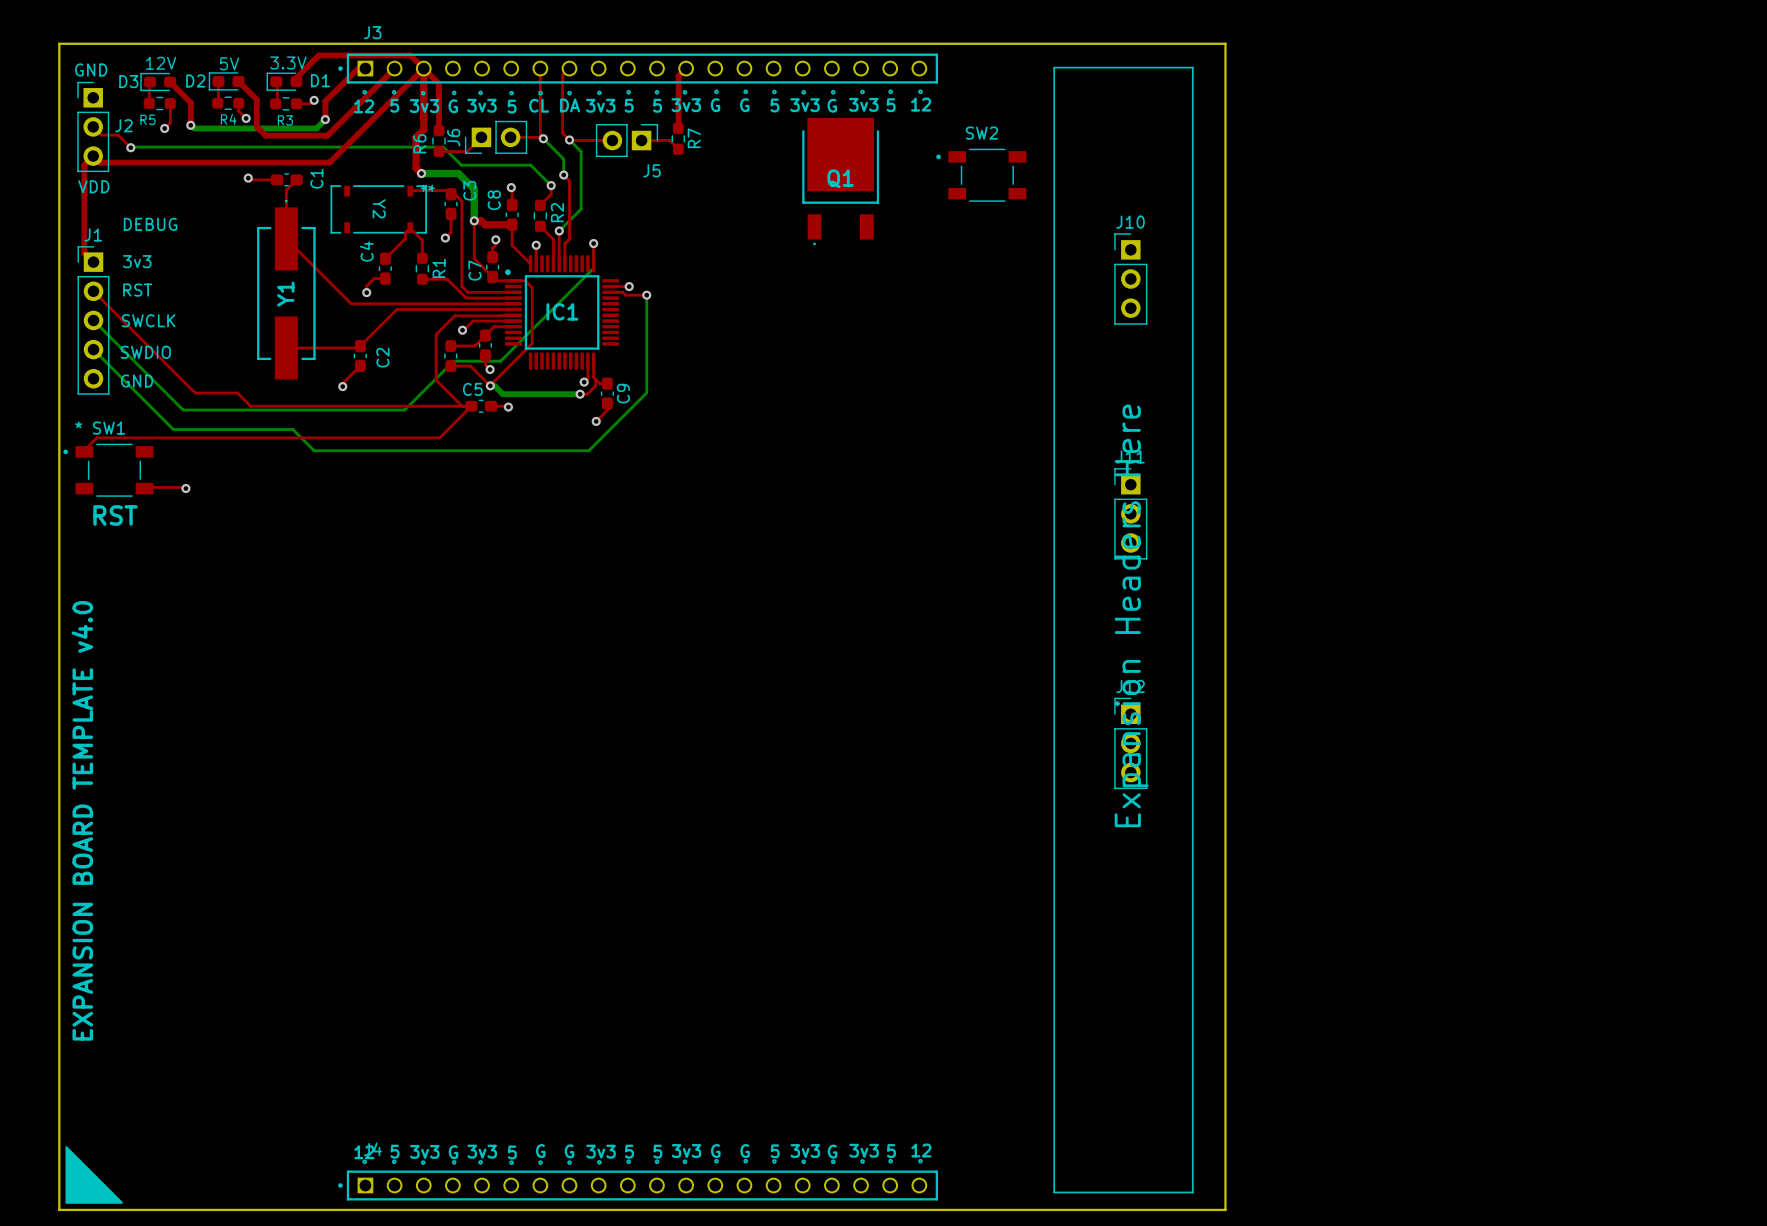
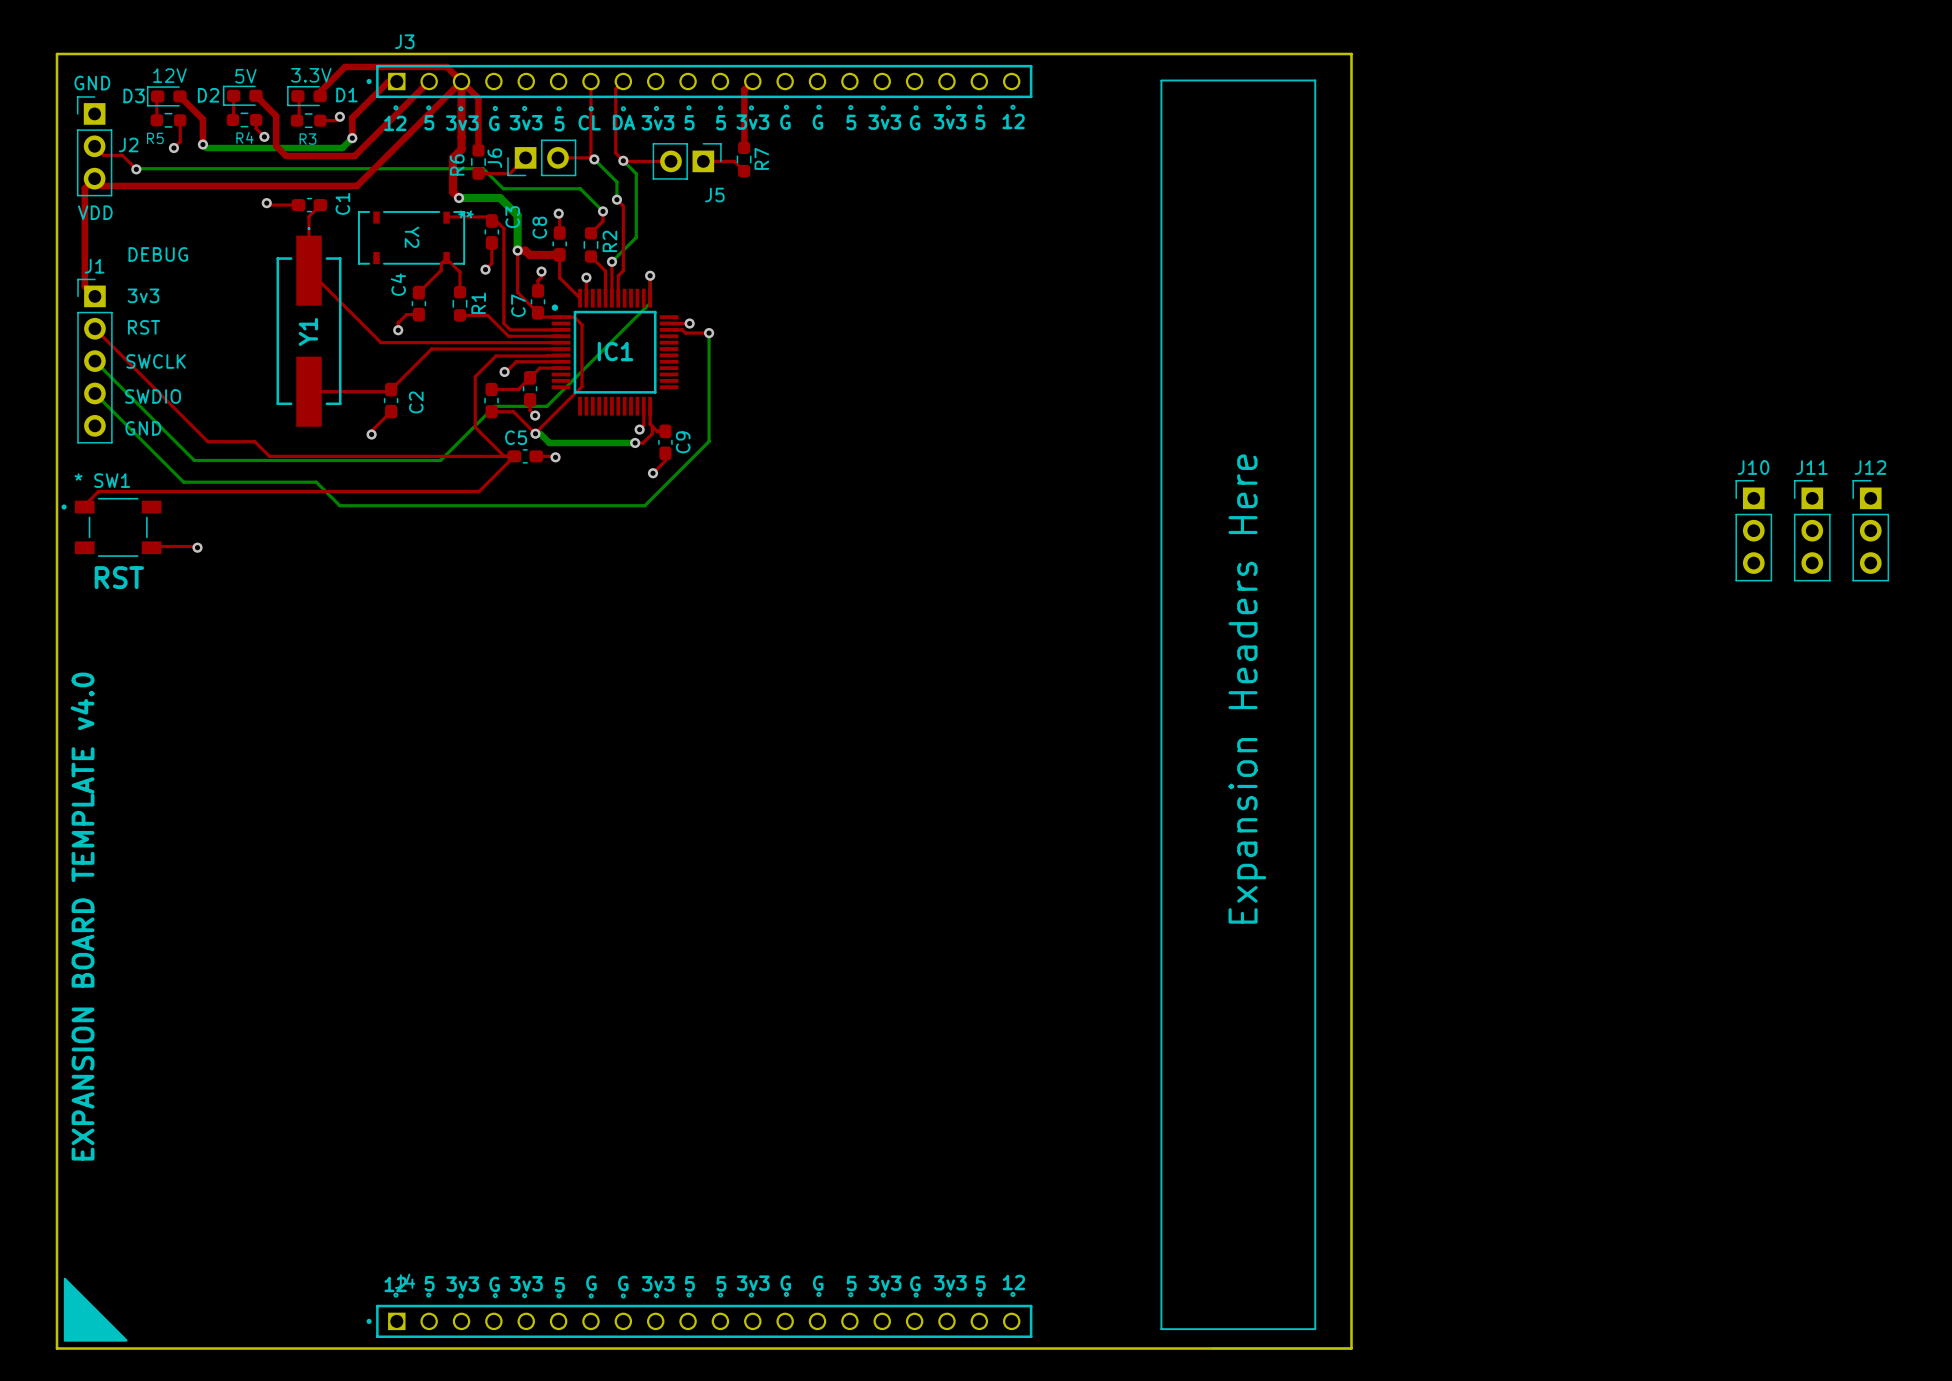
SW2: (981, 175) -> none
Q1: (840, 181) -> none
J10 position: (1130, 279) -> (1753, 530)
J11 position: (1130, 513) -> (1812, 530)
J12 position: (1130, 743) -> (1870, 530)

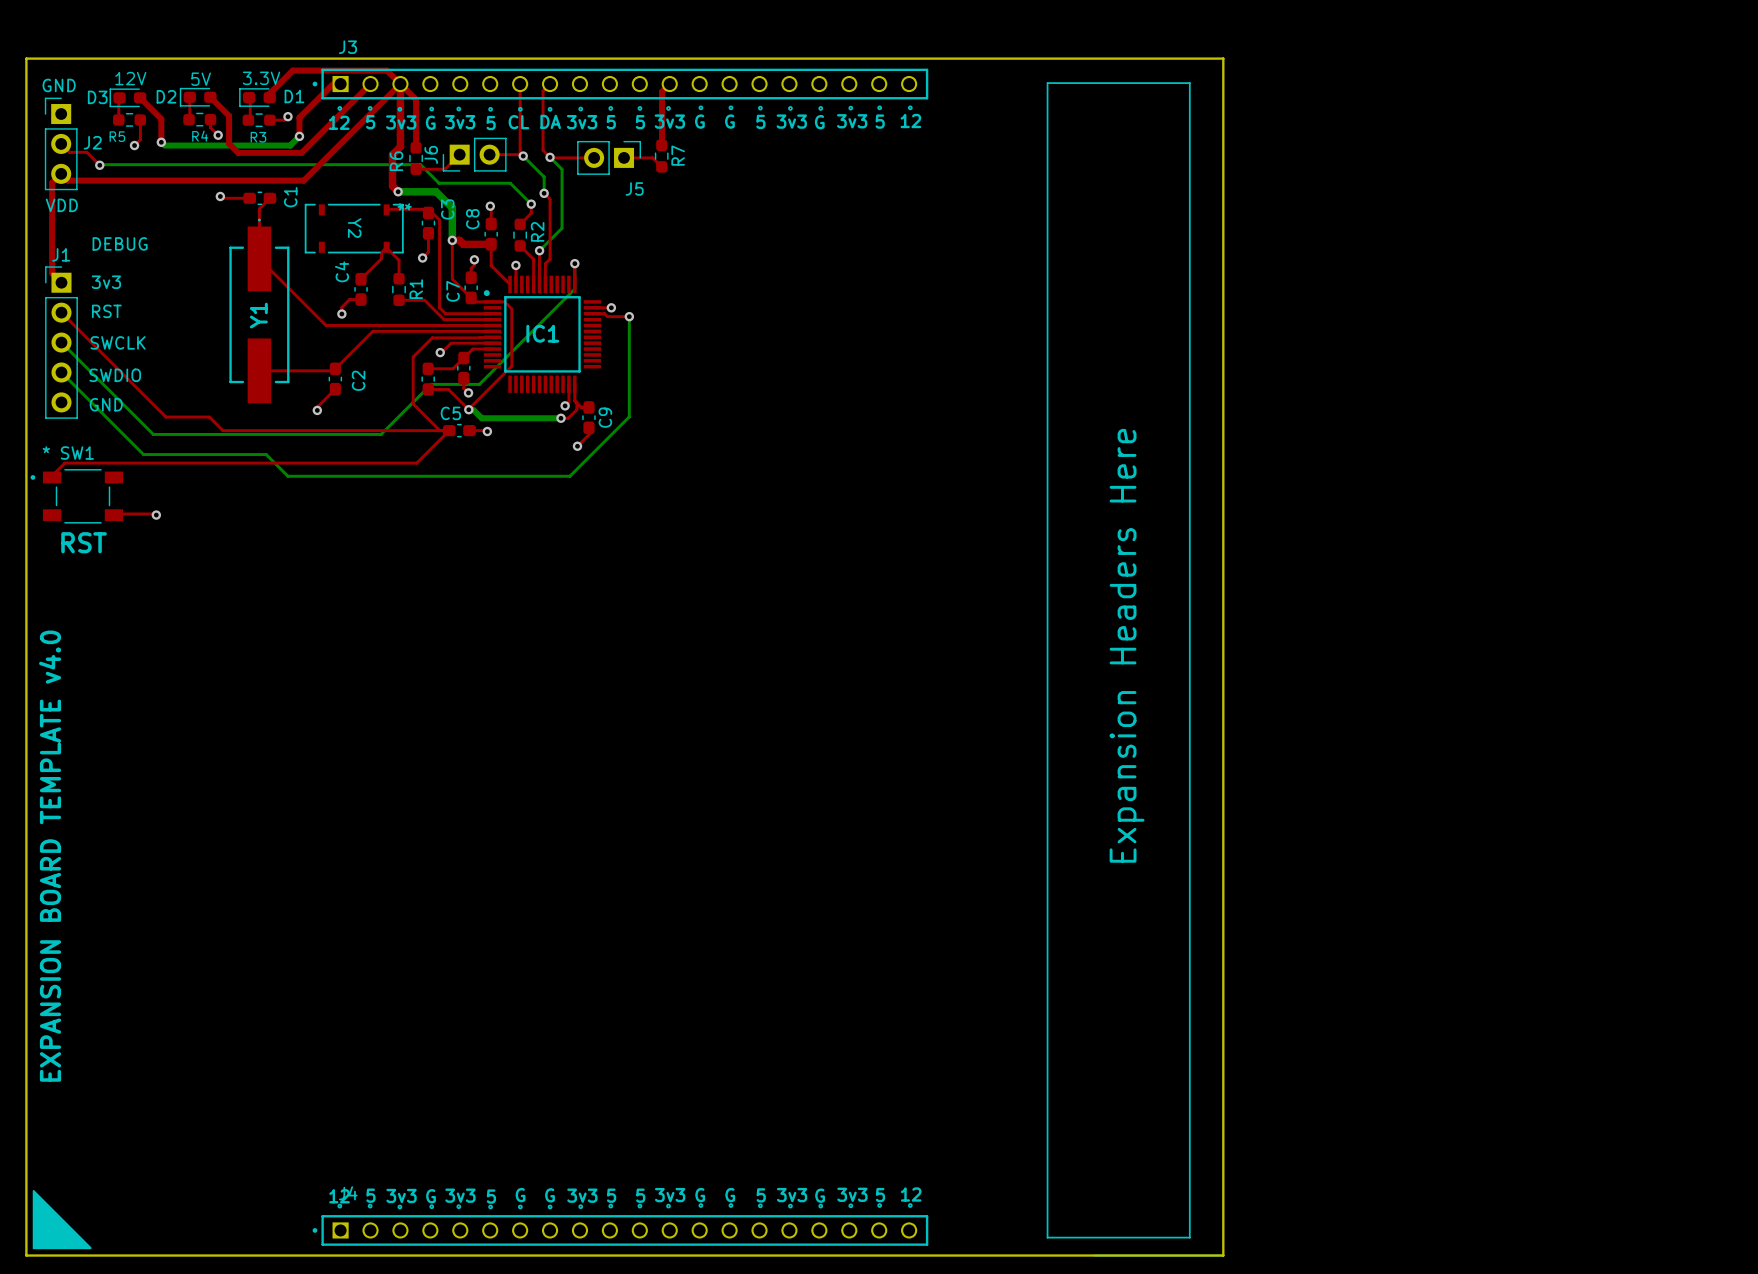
J10: (1753, 530) -> none
J11: (1812, 530) -> none
J12: (1870, 530) -> none

